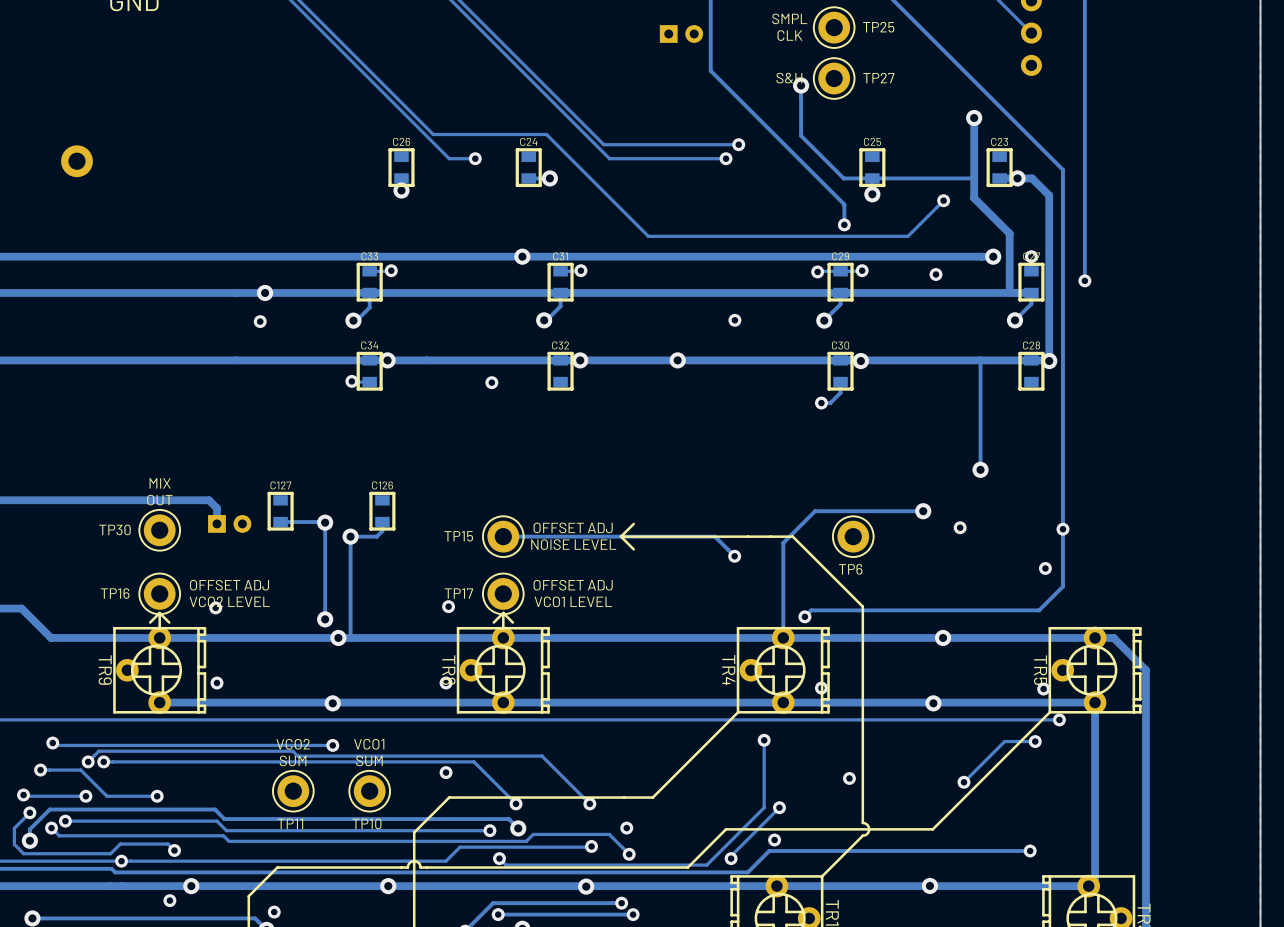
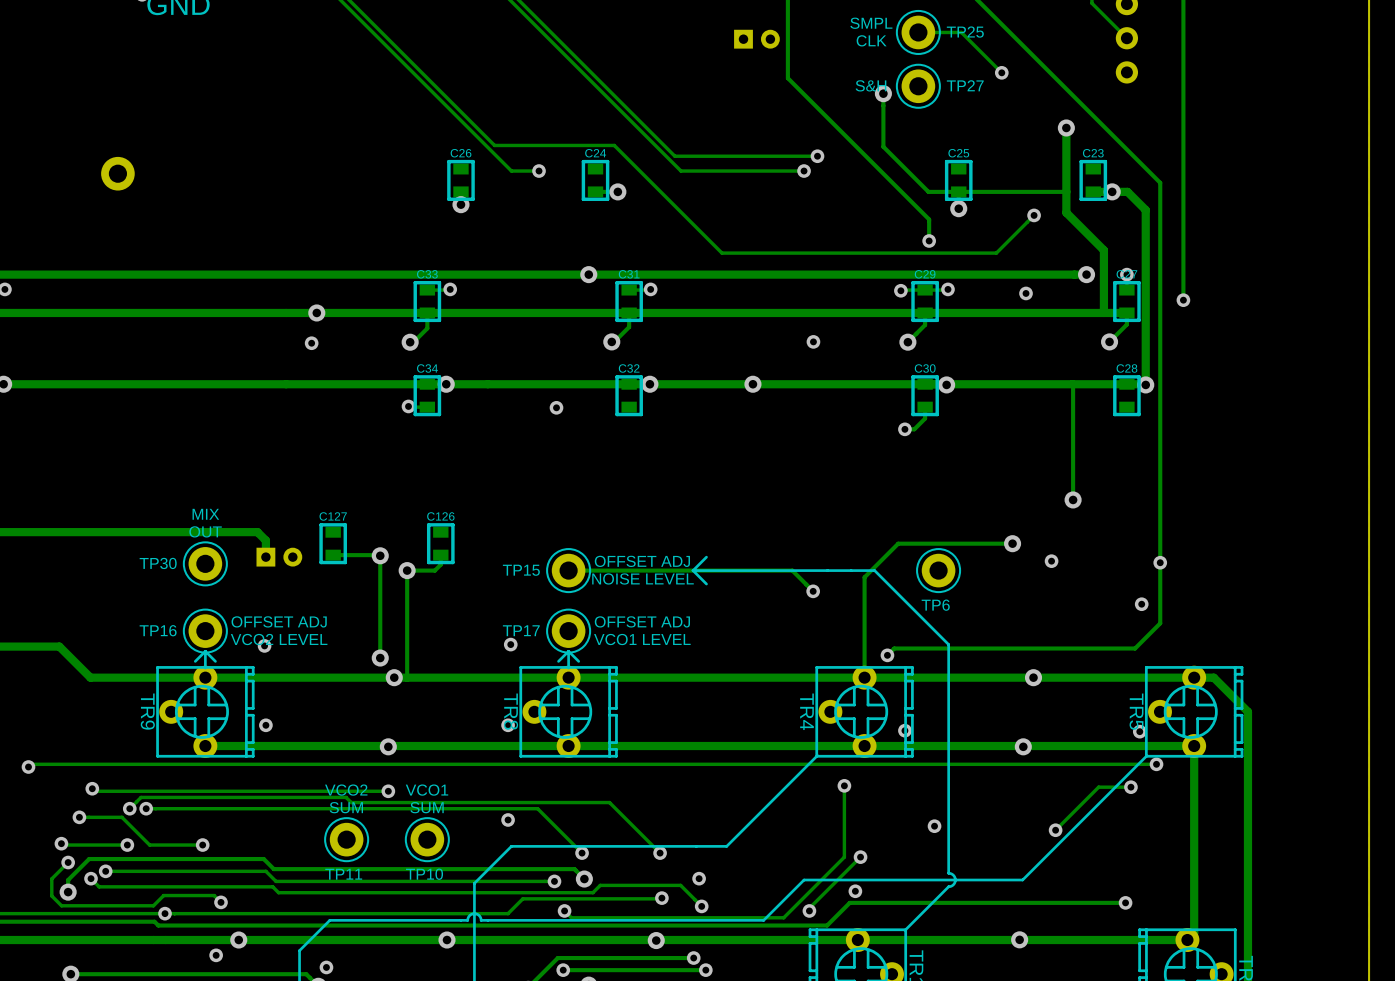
track: none -> (918, 32) (961, 32) (1001, 72)
via: none -> (1001, 72)

